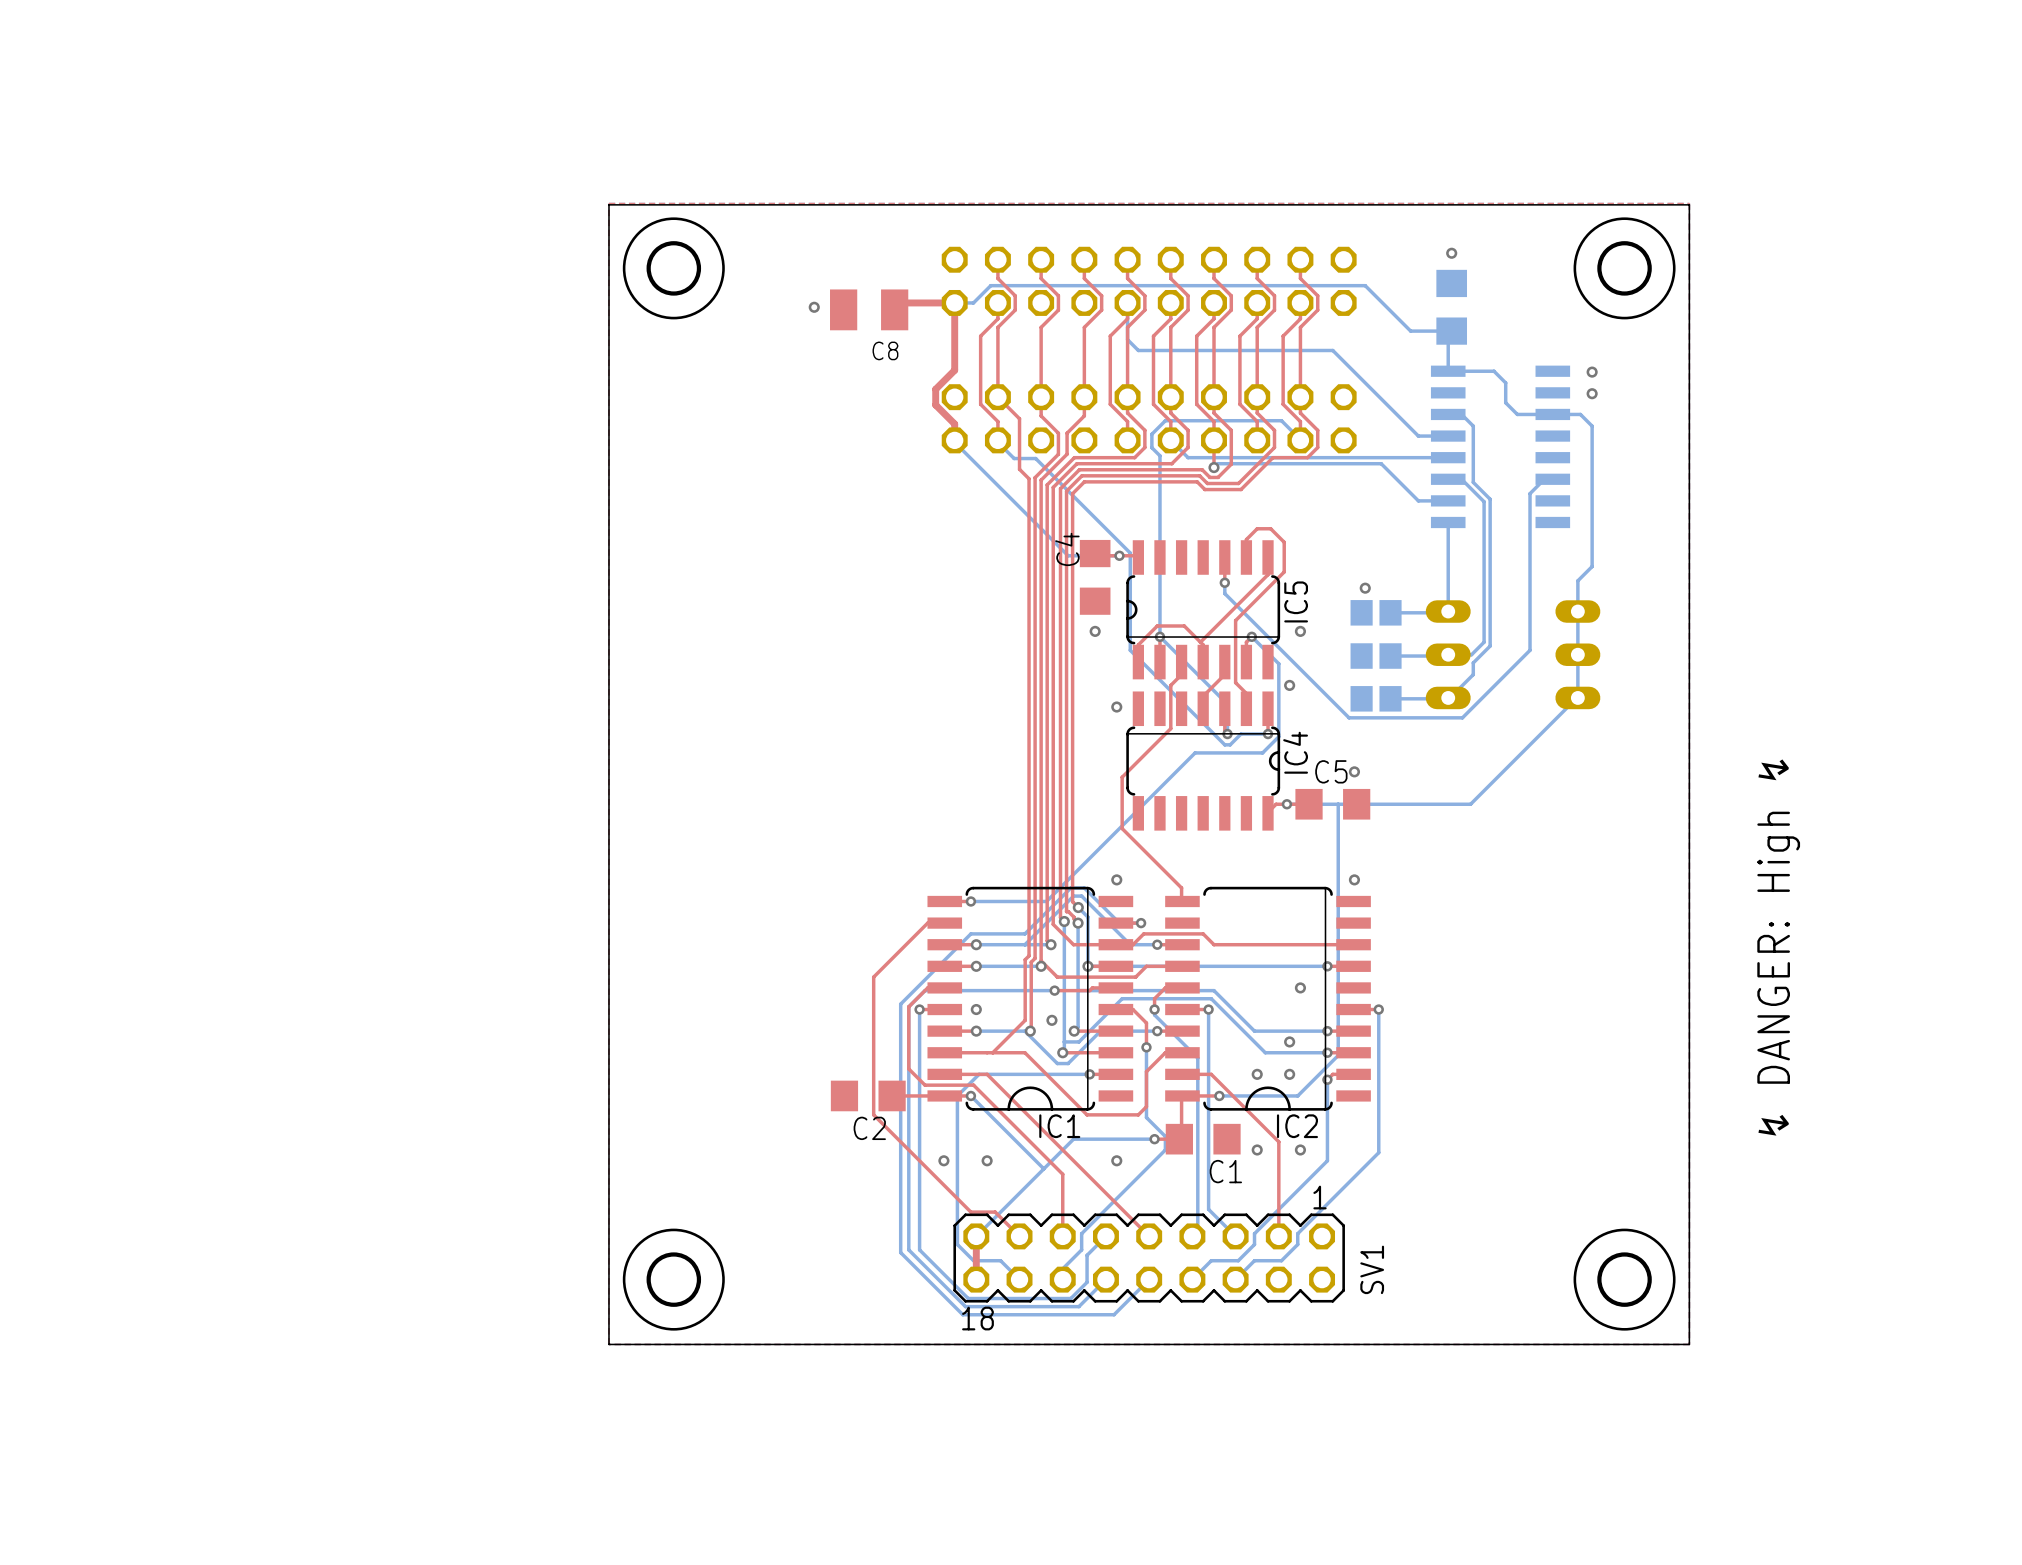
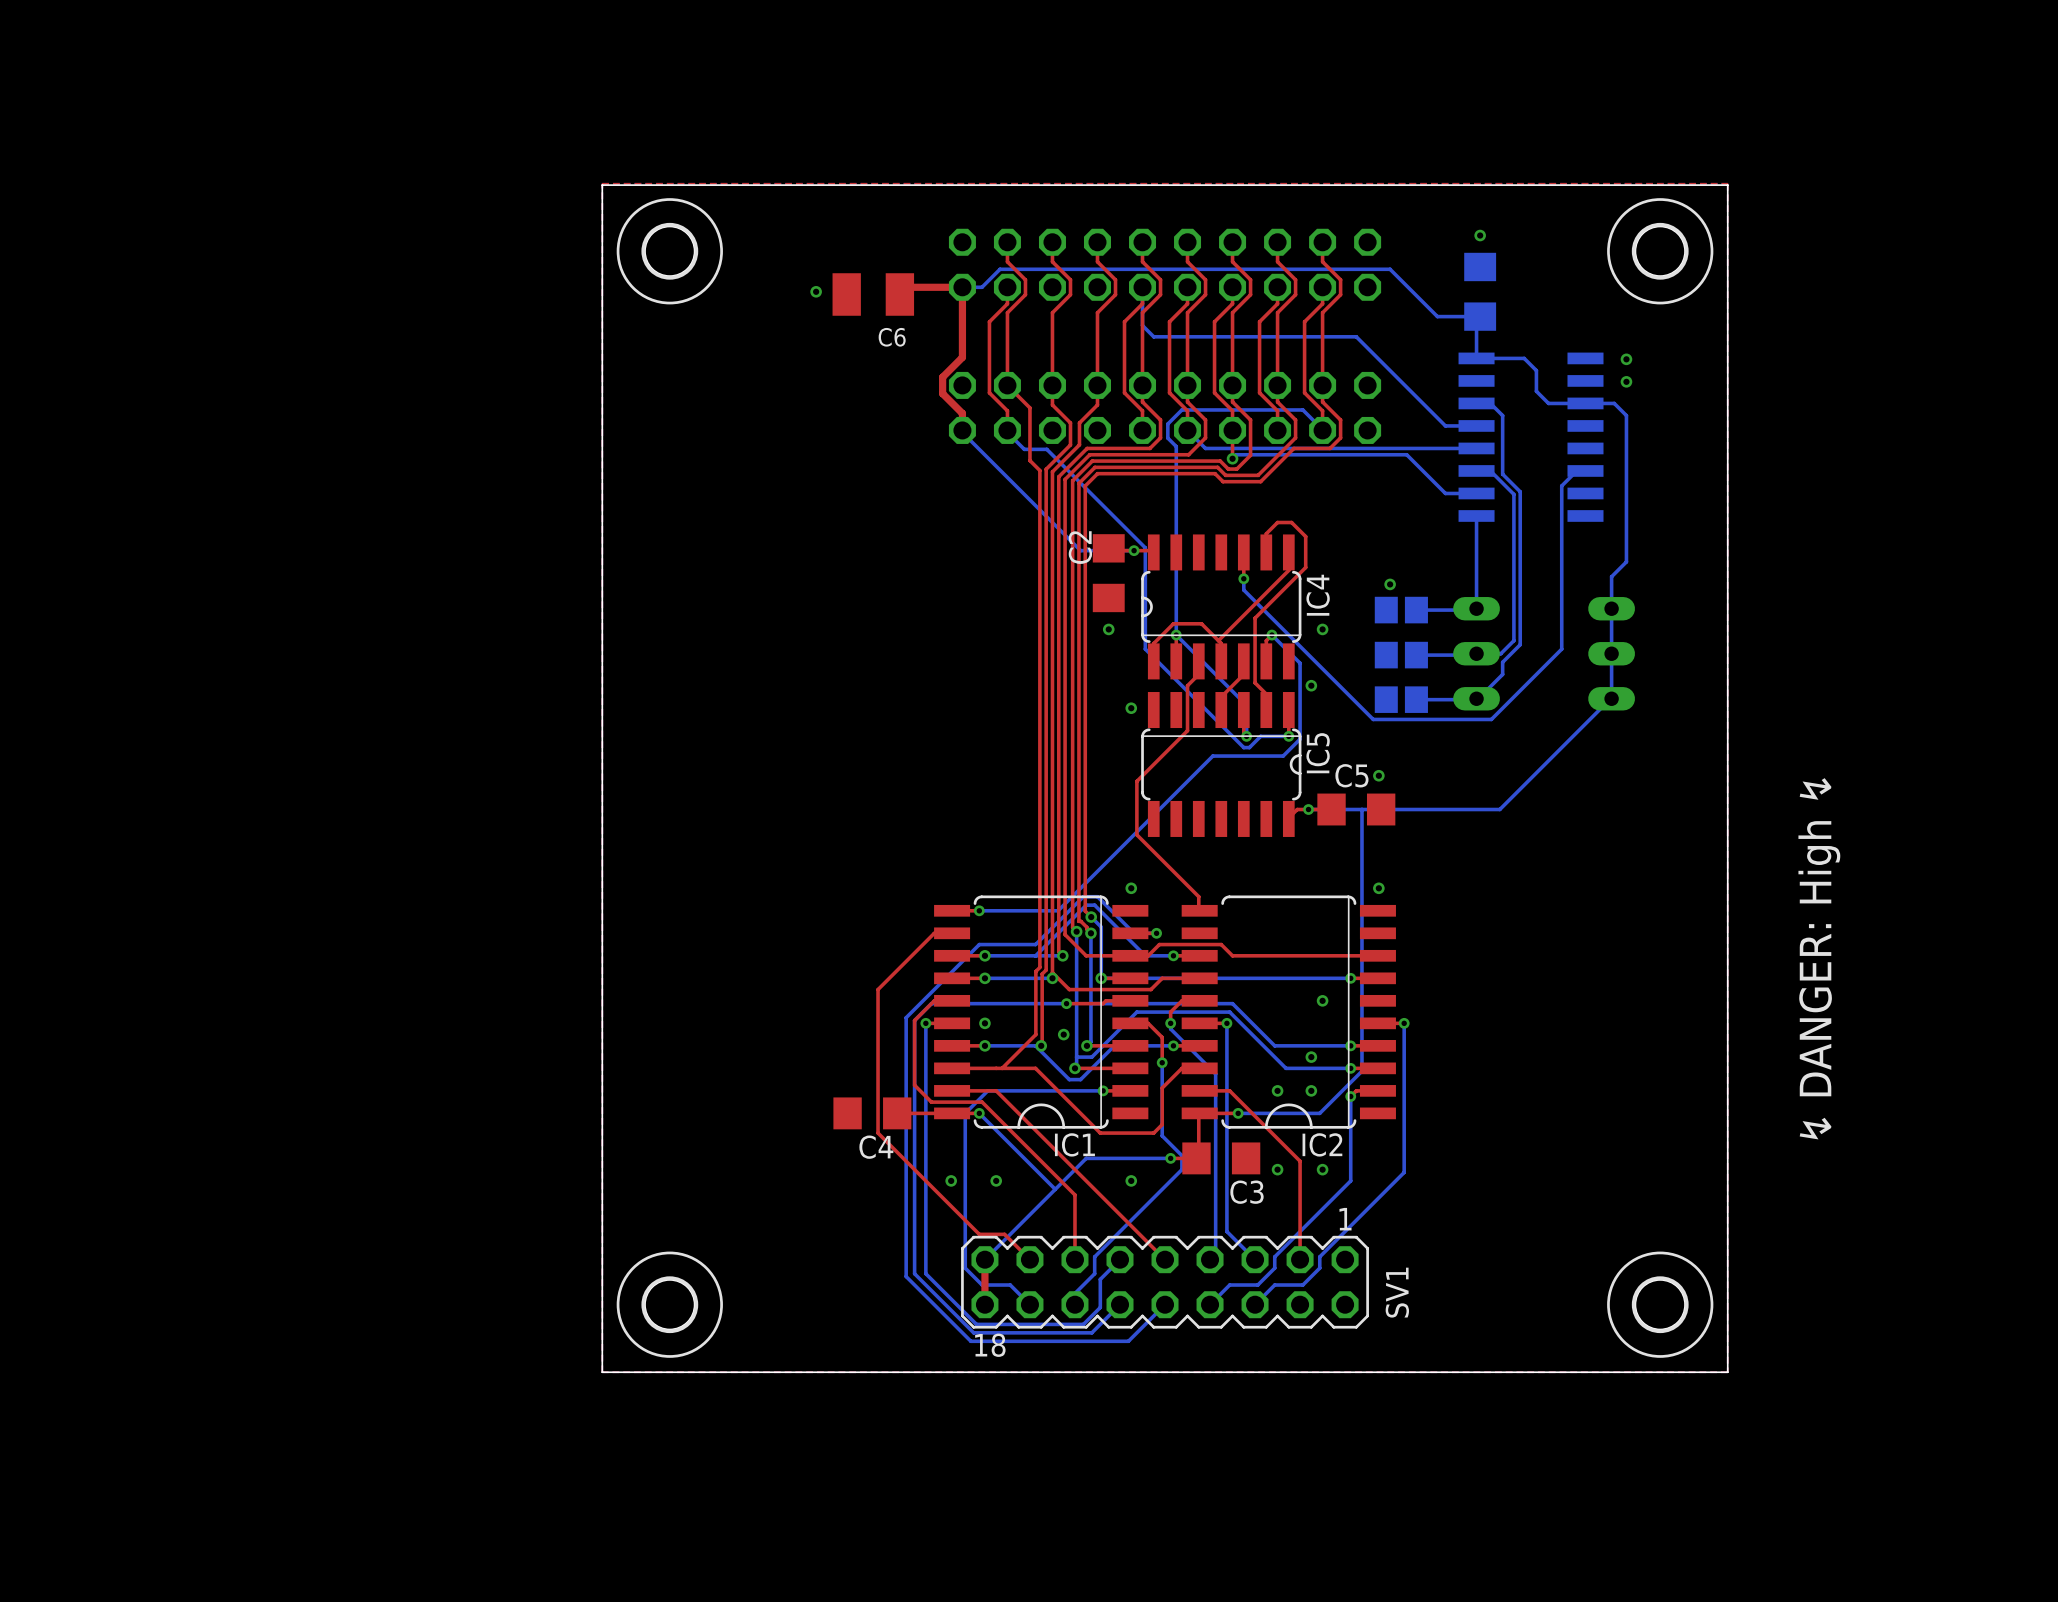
C8 name: C8 (885, 350) -> C6 (892, 337)
C4 name: C4 (1067, 549) -> C2 (1080, 547)
IC5 name: IC5 (1296, 601) -> IC4 (1318, 595)
IC4 name: IC4 (1295, 752) -> IC5 (1318, 753)
C2 name: C2 (869, 1128) -> C4 (876, 1147)
C1 name: C1 (1225, 1171) -> C3 (1246, 1192)

